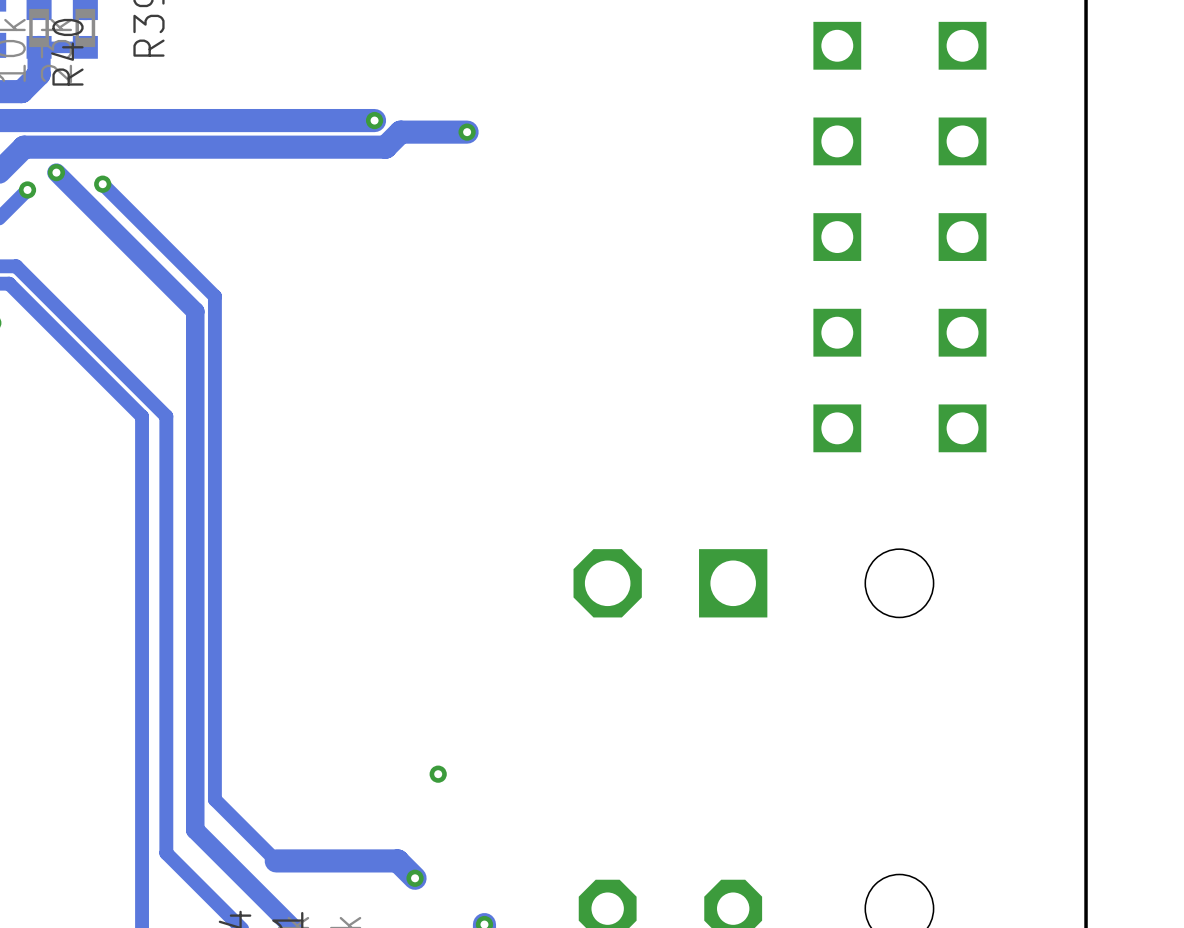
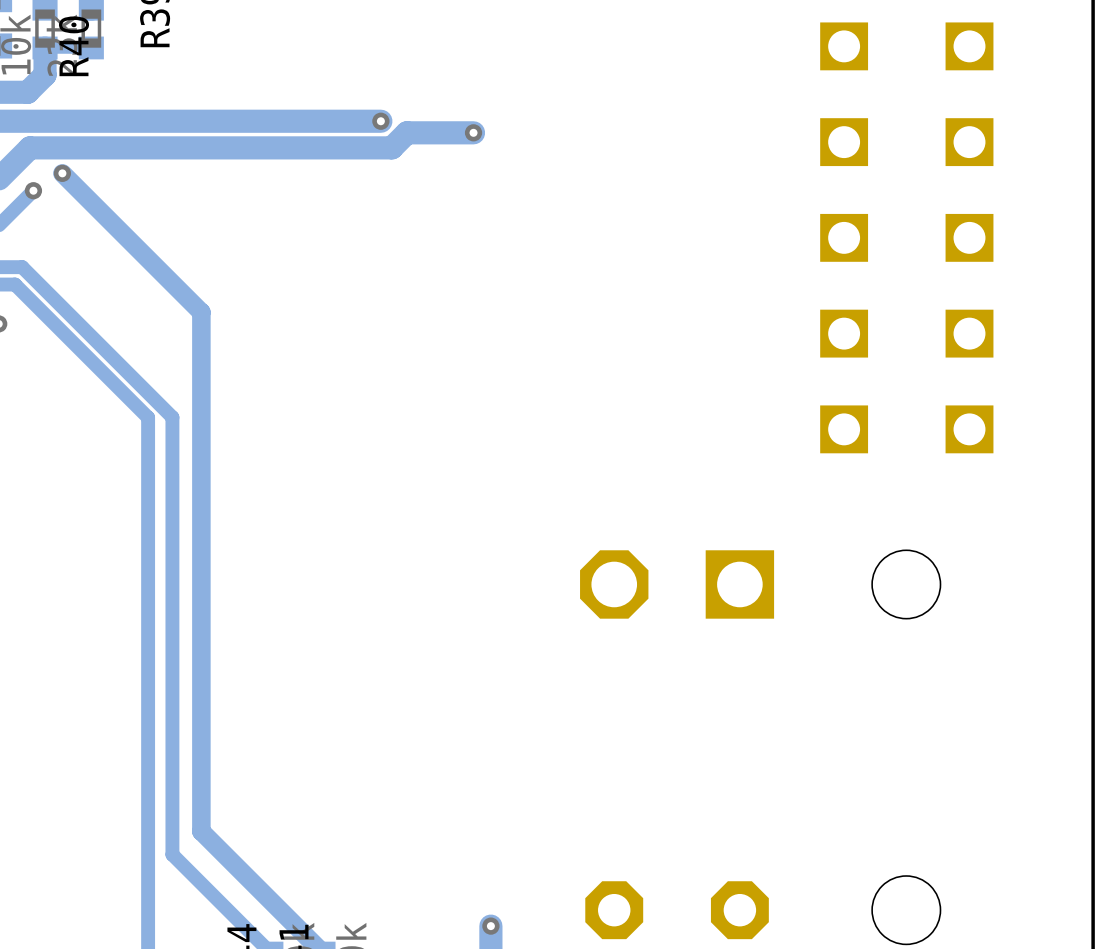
track: (102, 184) (214, 296) (214, 799) (276, 860) (397, 860) (415, 878) -> none
via: (102, 184) -> none
via: (438, 774) -> none
via: (415, 878) -> none

